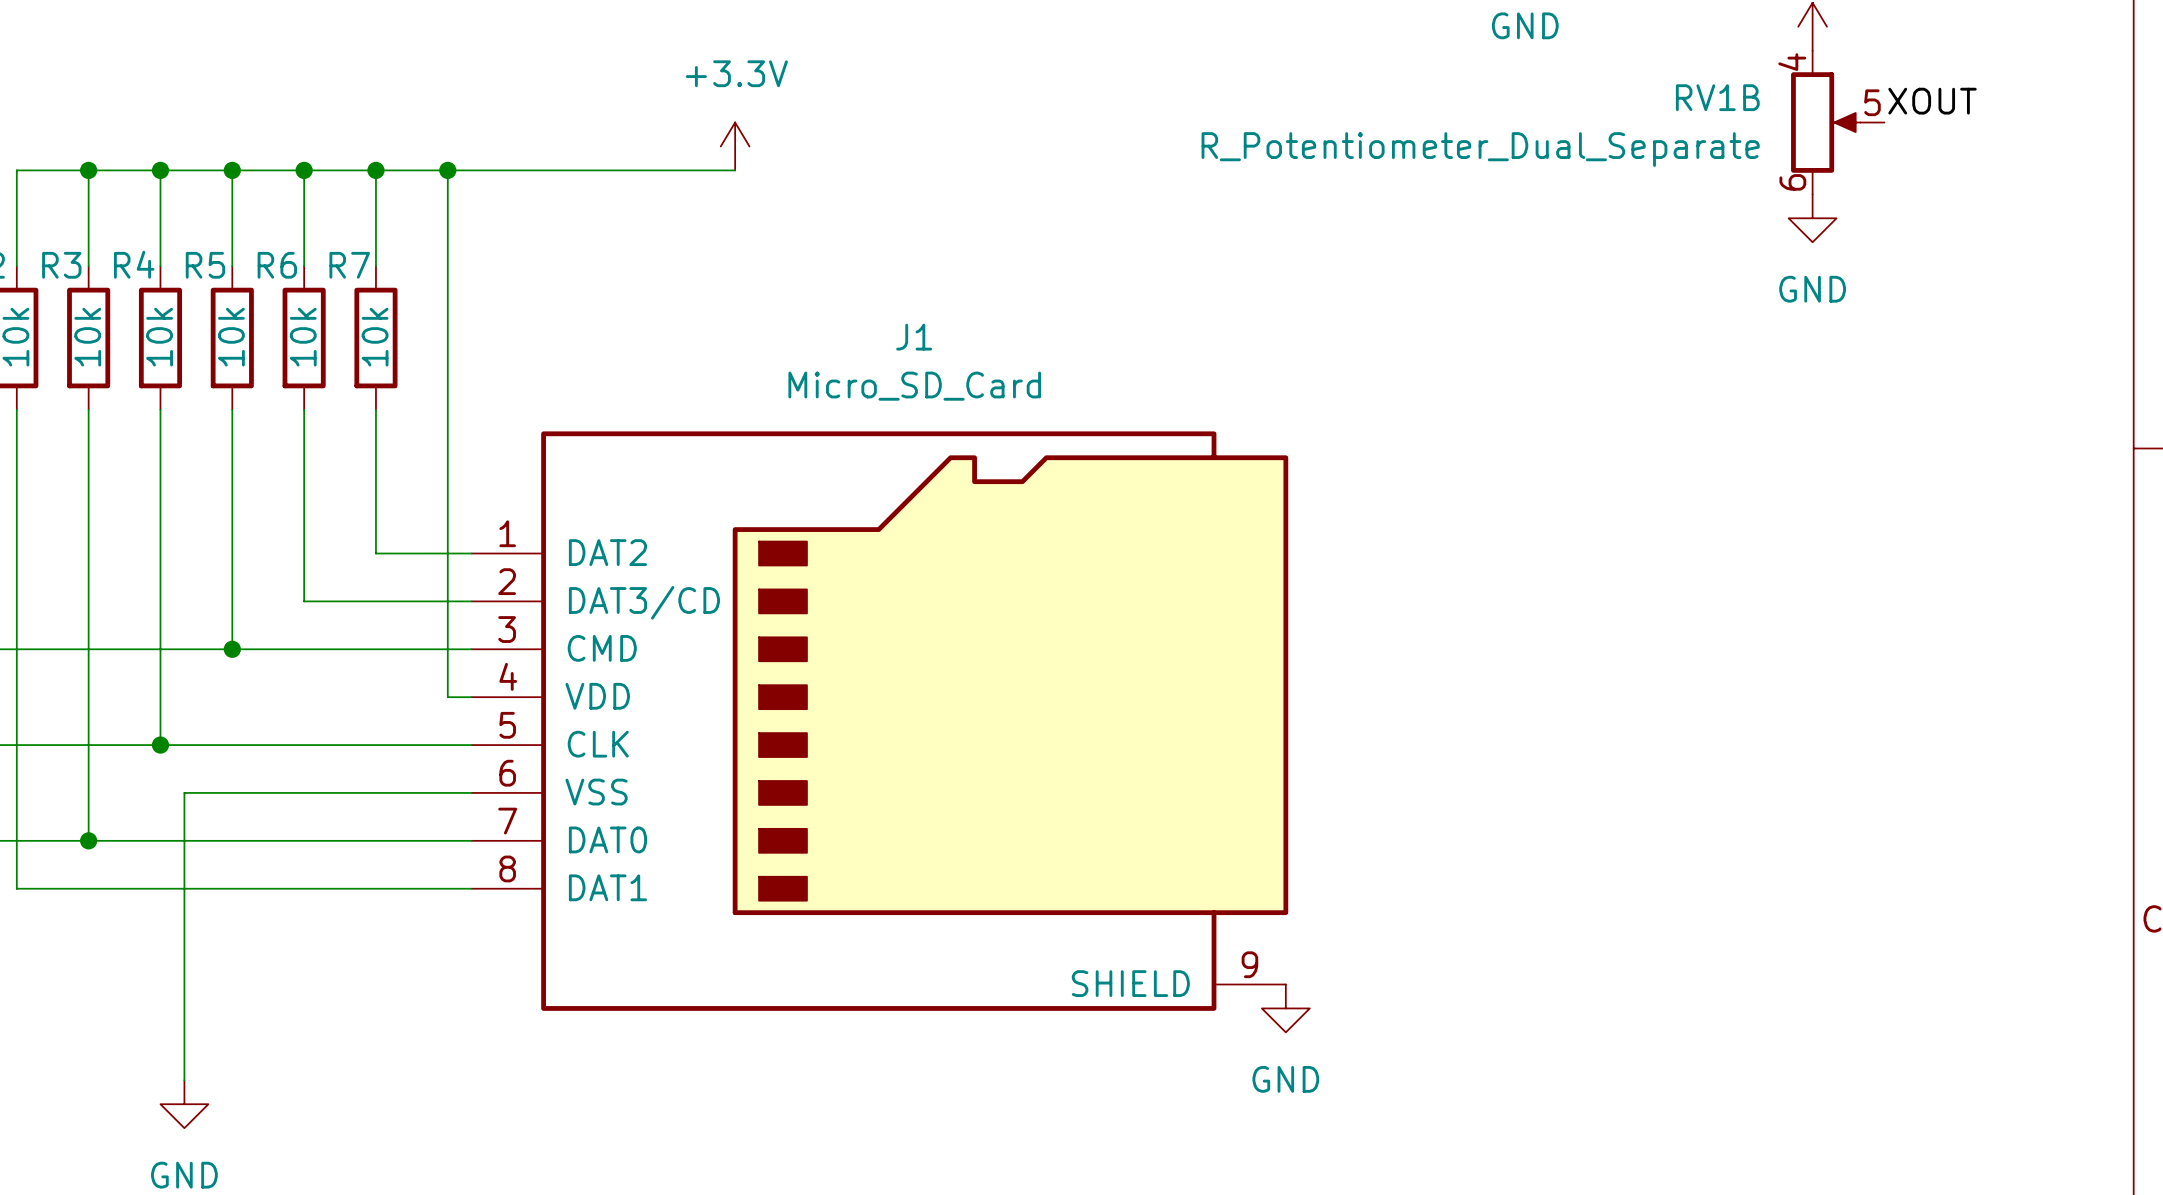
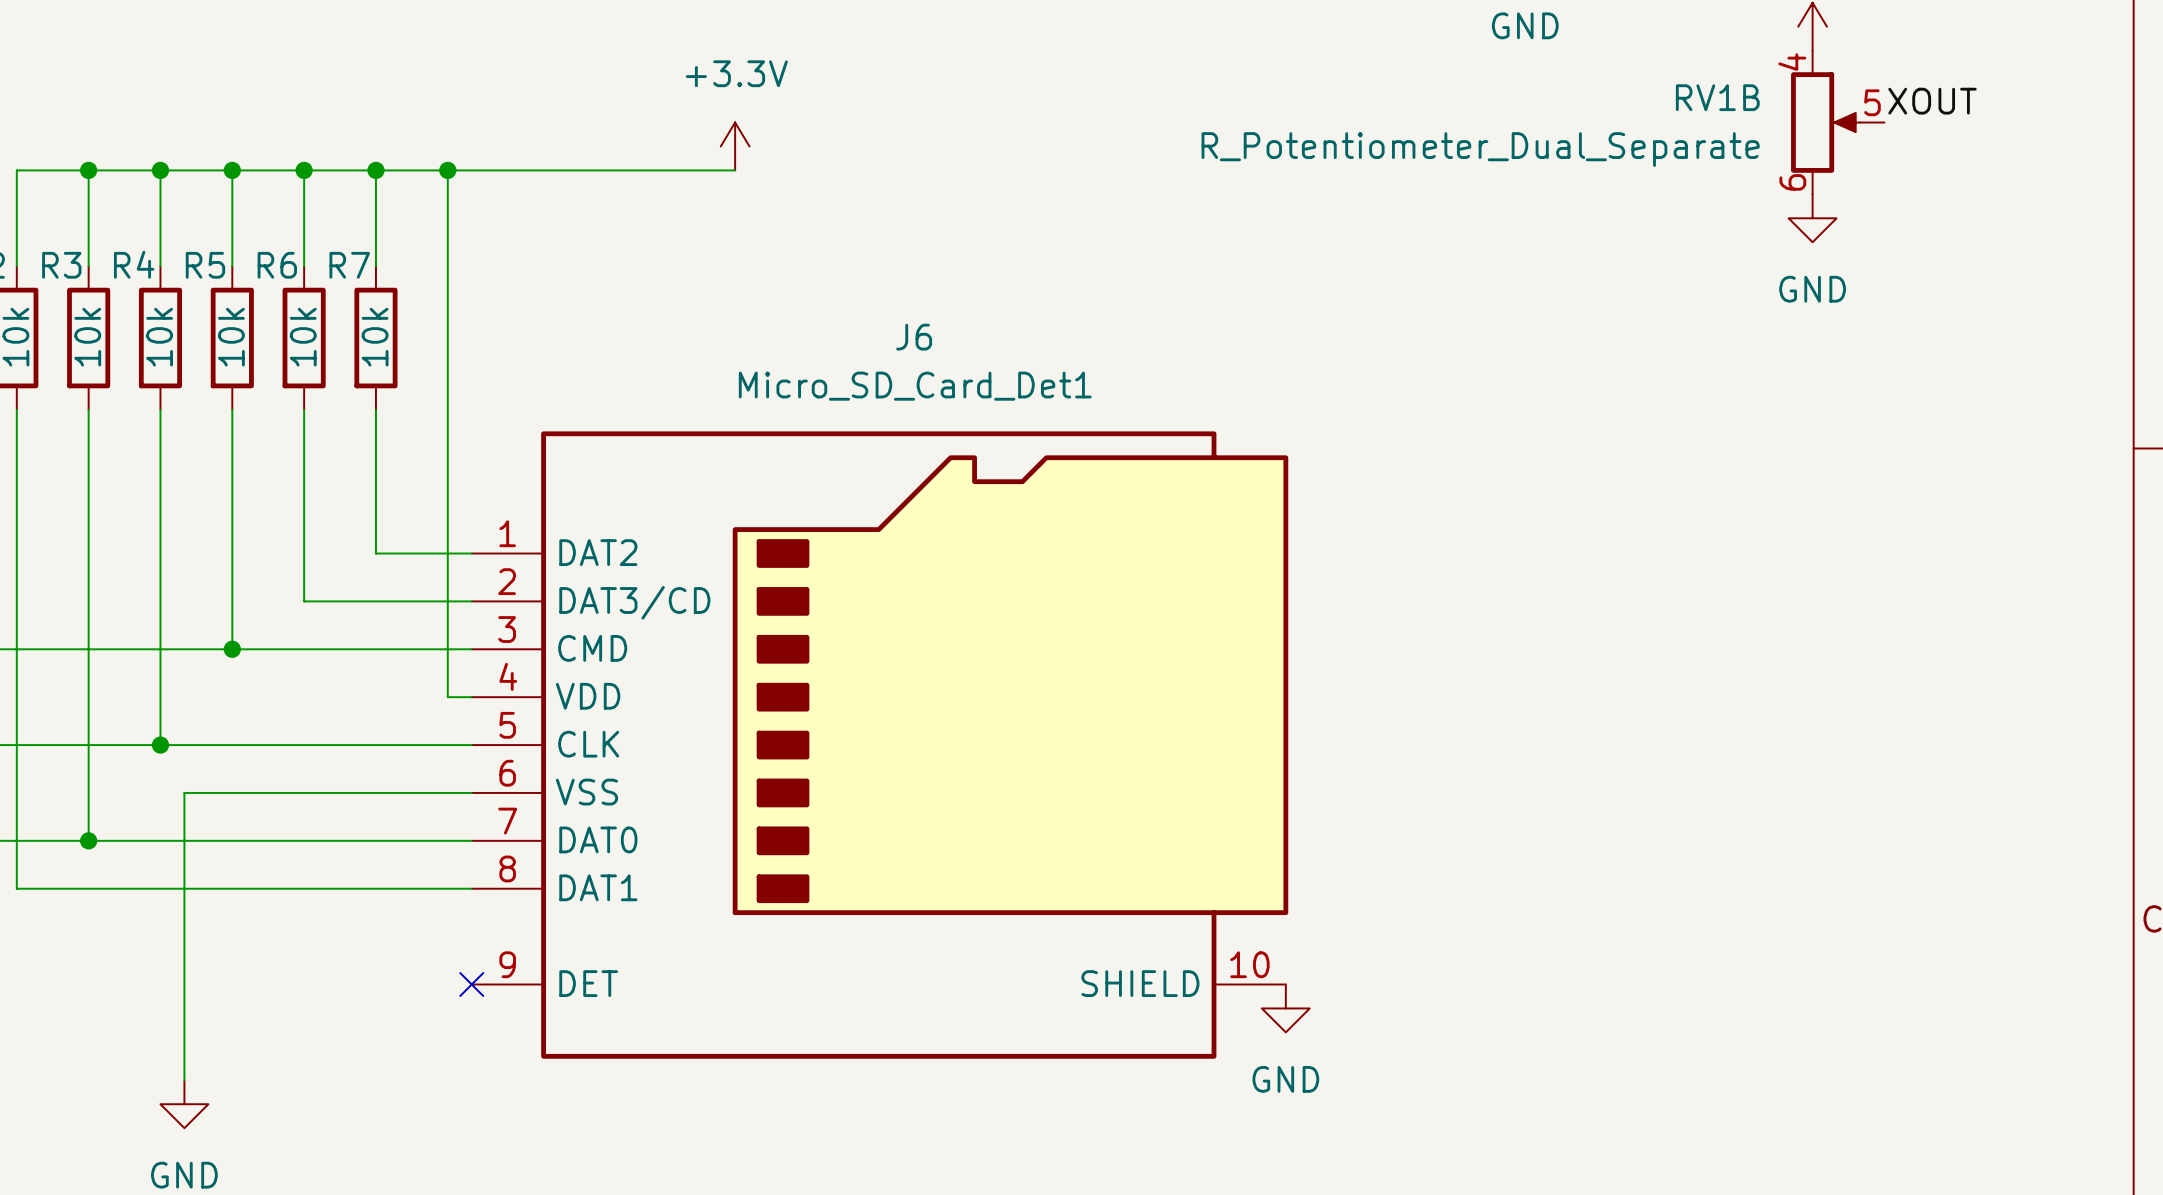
J1: Micro_SD_Card (879, 721) -> none
J6: none -> Micro_SD_Card_Det1 (879, 745)
no-connect mark: none -> (471, 984)

